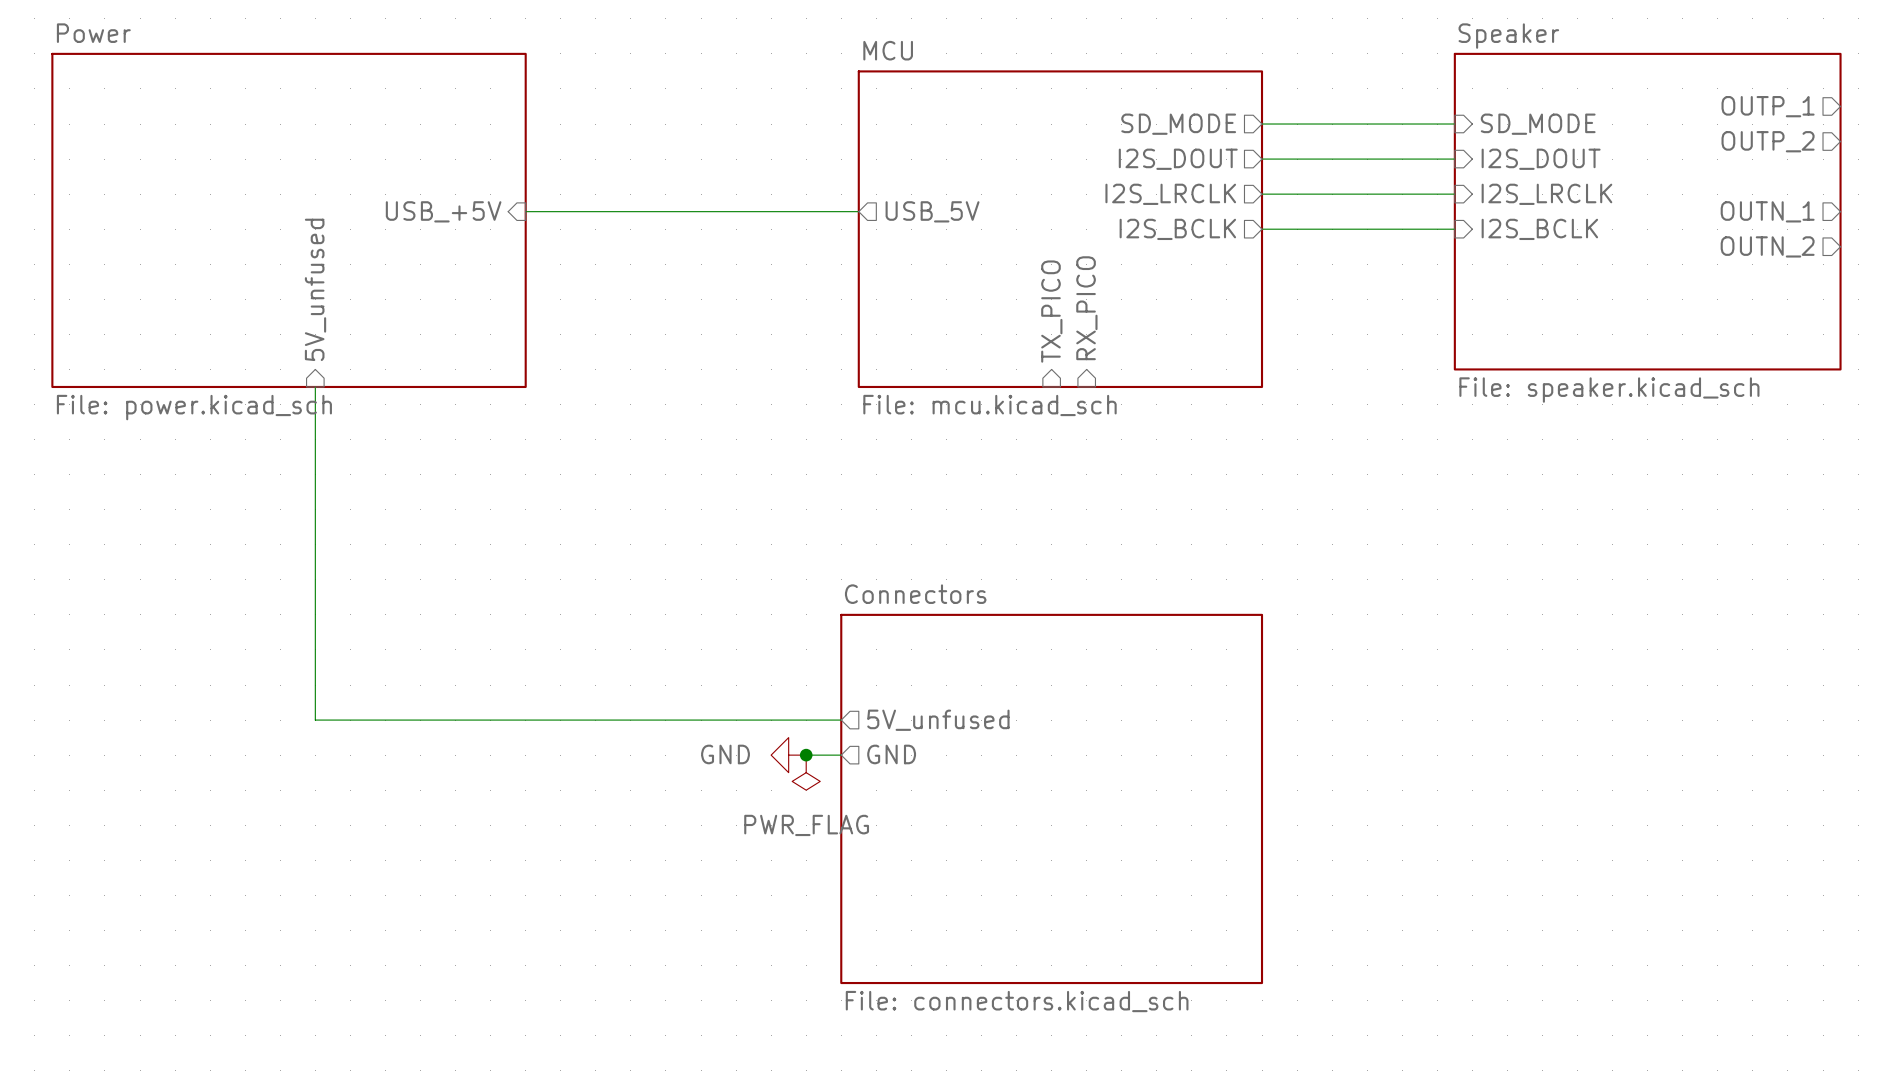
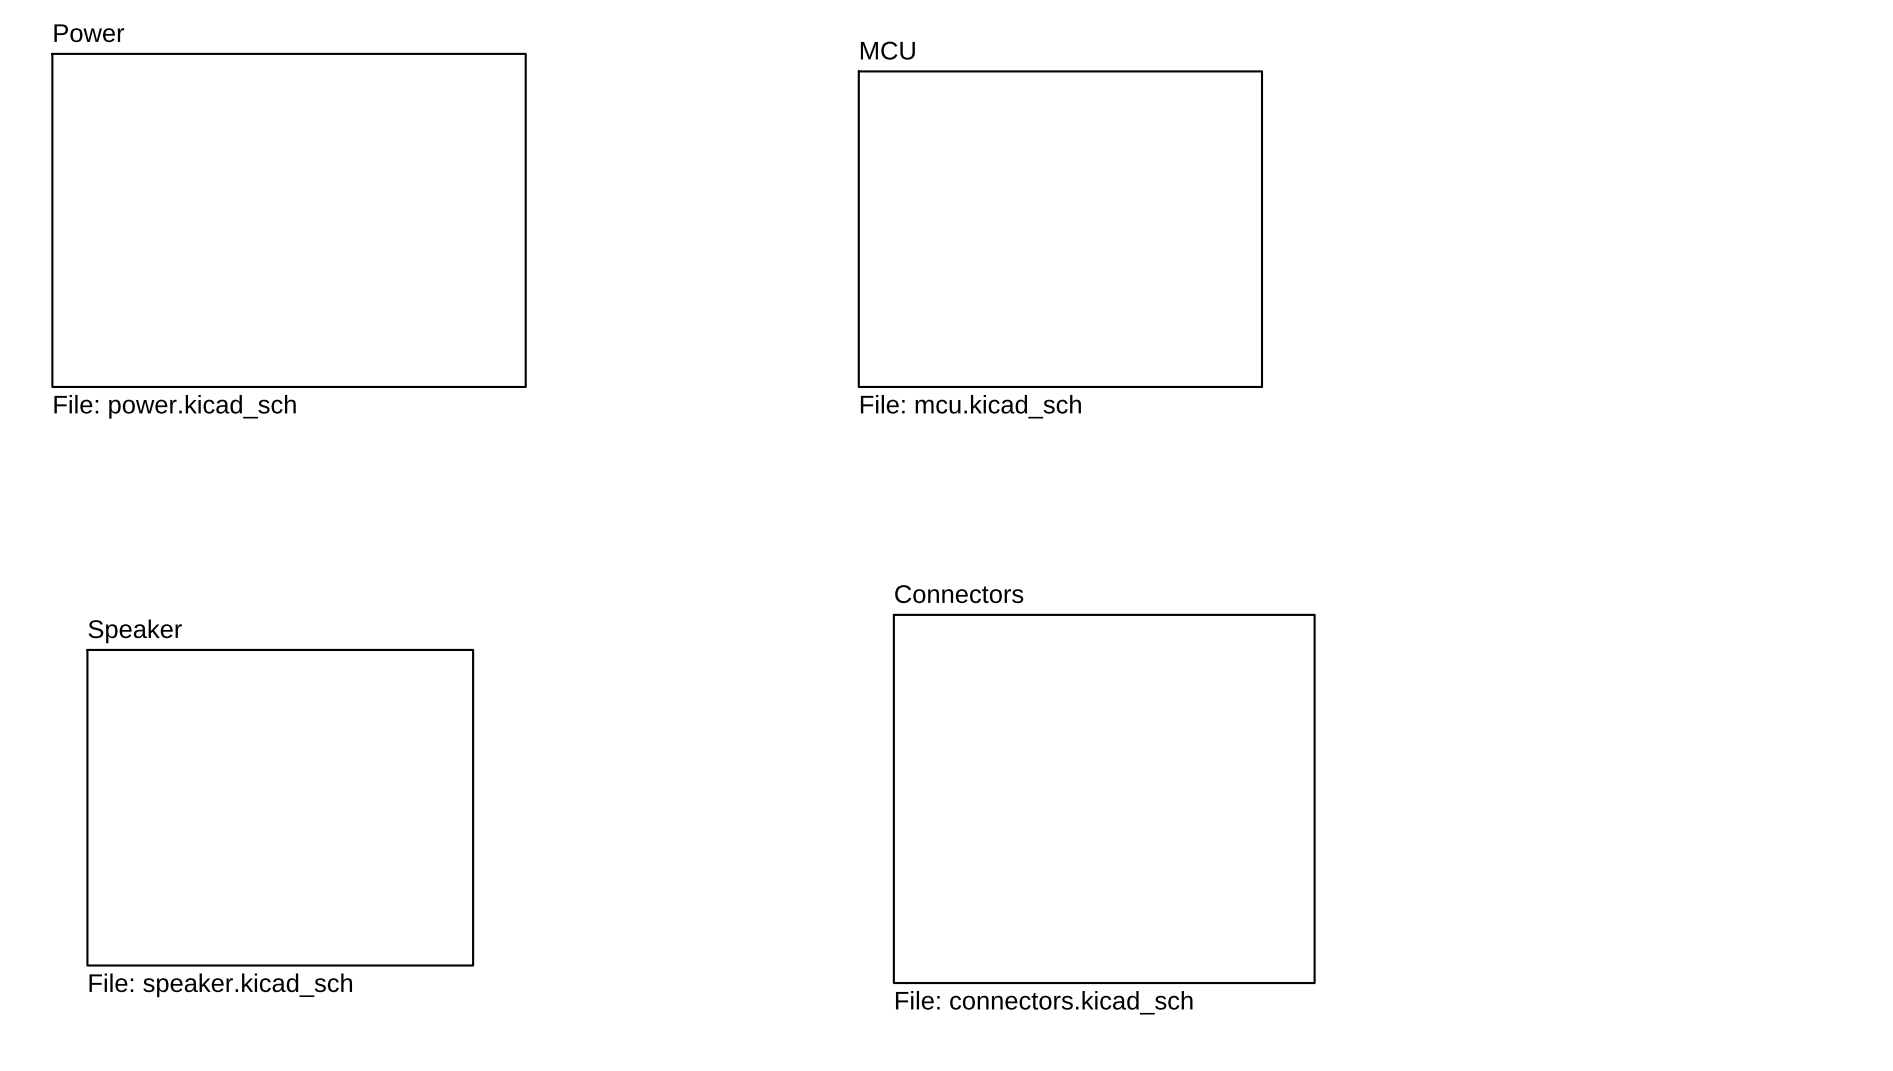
sheet pin: OUTP_1 (1768, 106) -> none
sheet pin: SD_MODE (1178, 124) -> none
wire: (1262, 124) (1454, 124) -> none
sheet pin: SD_MODE (1538, 124) -> none
sheet pin: OUTP_2 (1768, 141) -> none
sheet pin: I2S_DOUT (1178, 159) -> none
wire: (1262, 159) (1454, 159) -> none
sheet pin: I2S_DOUT (1541, 159) -> none
sheet pin: I2S_LRCLK (1170, 194) -> none
wire: (1262, 194) (1454, 194) -> none
sheet pin: I2S_LRCLK (1546, 194) -> none
sheet pin: USB_+5V (443, 211) -> none
wire: (525, 211) (858, 211) -> none
sheet pin: USB_5V (932, 211) -> none
sheet Speaker: File: speaker.kicad_sch (1647, 211) -> none
sheet pin: OUTN_1 (1767, 211) -> none
sheet pin: I2S_BCLK (1177, 229) -> none
wire: (1262, 229) (1454, 229) -> none
sheet pin: I2S_BCLK (1539, 229) -> none
sheet pin: OUTN_2 (1767, 246) -> none
sheet pin: 5V_unfused (315, 289) -> none
sheet pin: RX_PICO (1086, 308) -> none
sheet pin: TX_PICO (1051, 311) -> none
wire: (315, 386) (315, 720) (841, 720) -> none
sheet pin: 5V_unfused (938, 720) -> none
sheet pin: GND (891, 754) -> none
power symbol: GND (788, 755) -> none
wire: (806, 755) (841, 755) -> none
junction: (806, 755) -> none
power symbol: PWR_FLAG (806, 772) -> none
sheet Connectors position: (1051, 798) -> (1104, 798)
sheet Speaker: none -> File: speaker.kicad_sch (280, 807)

